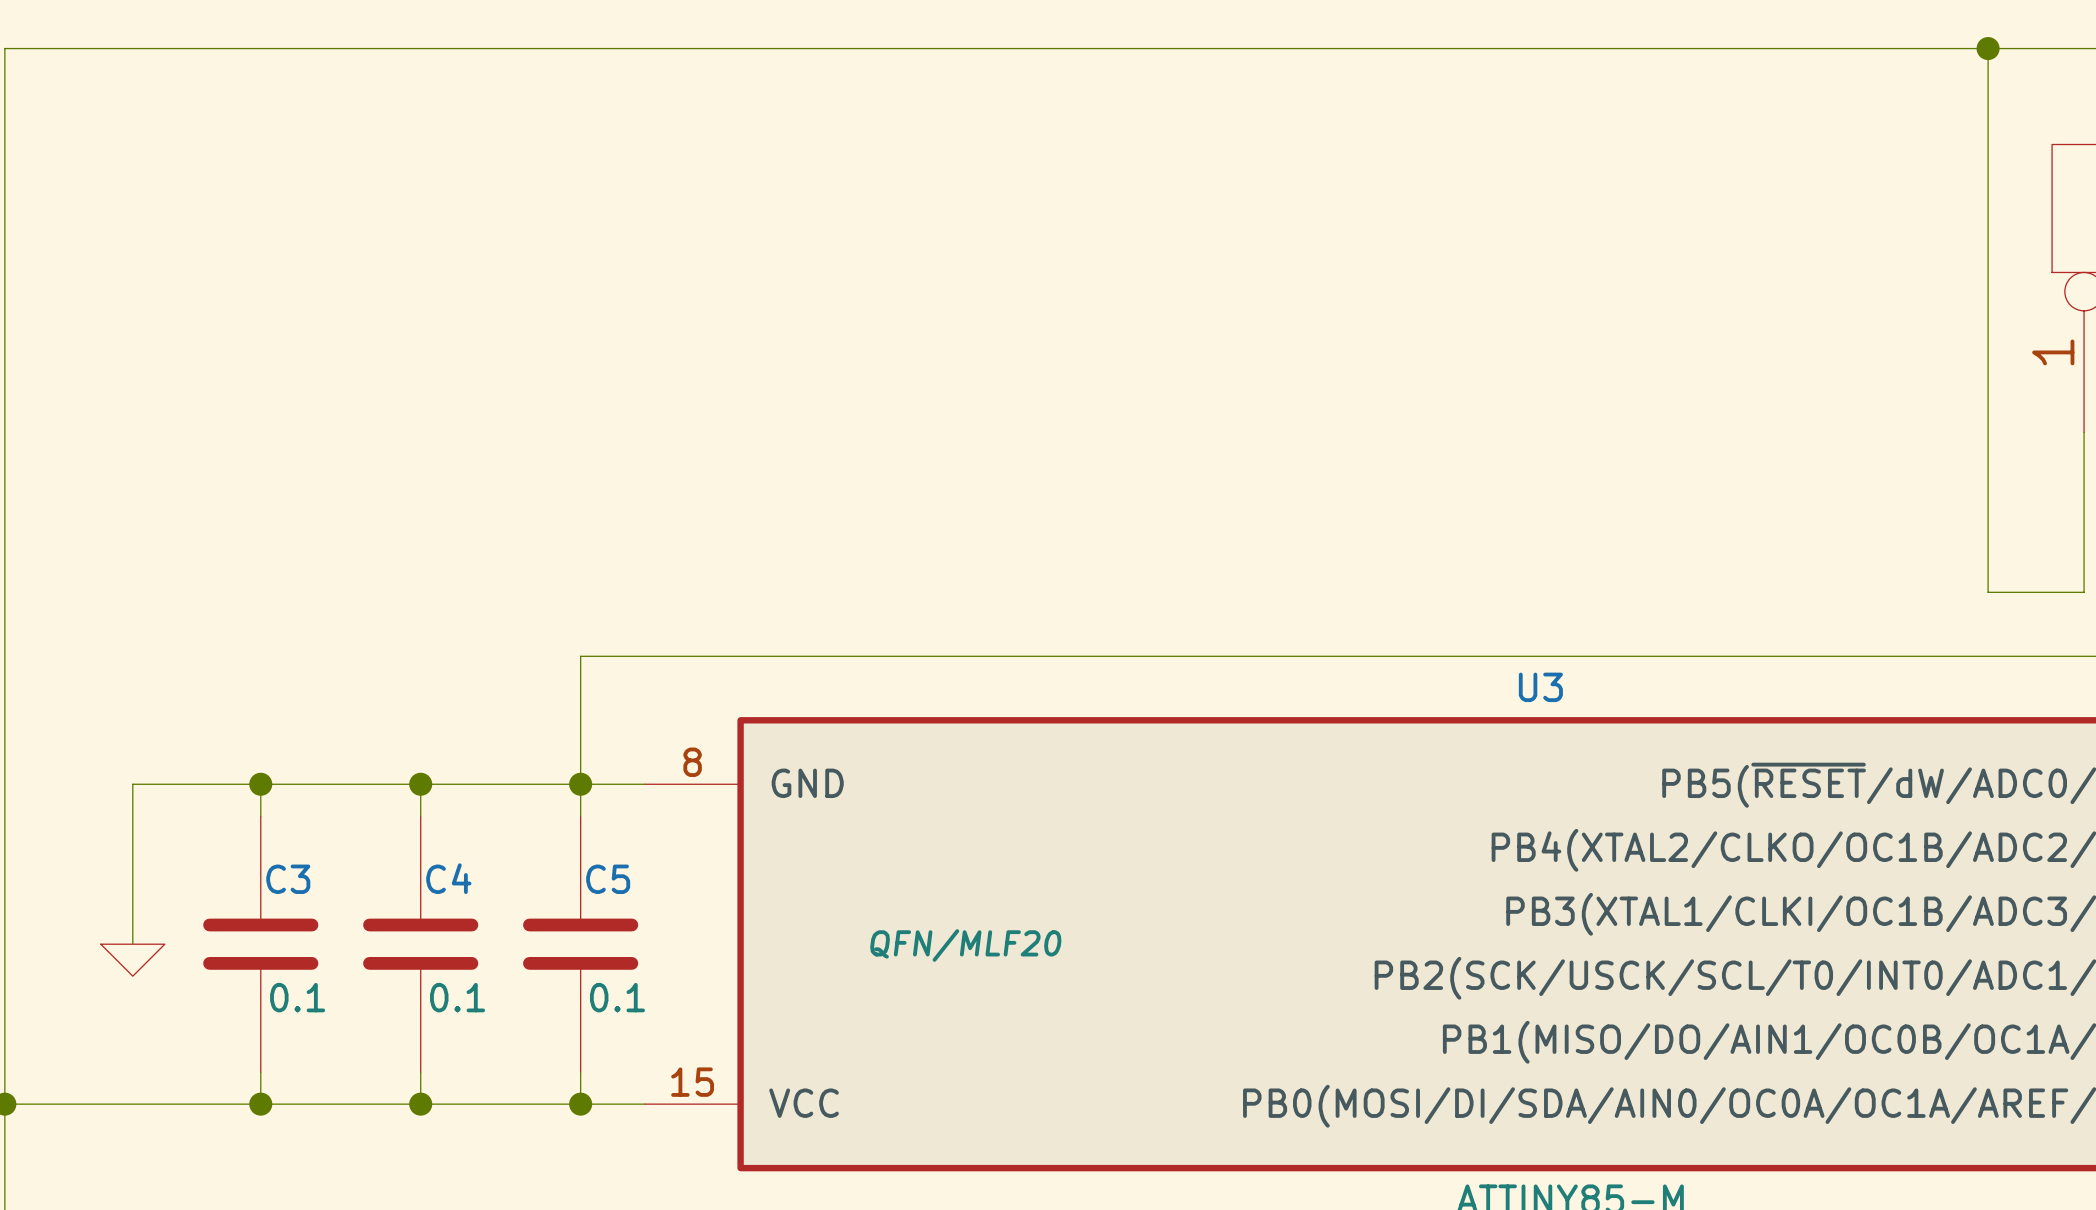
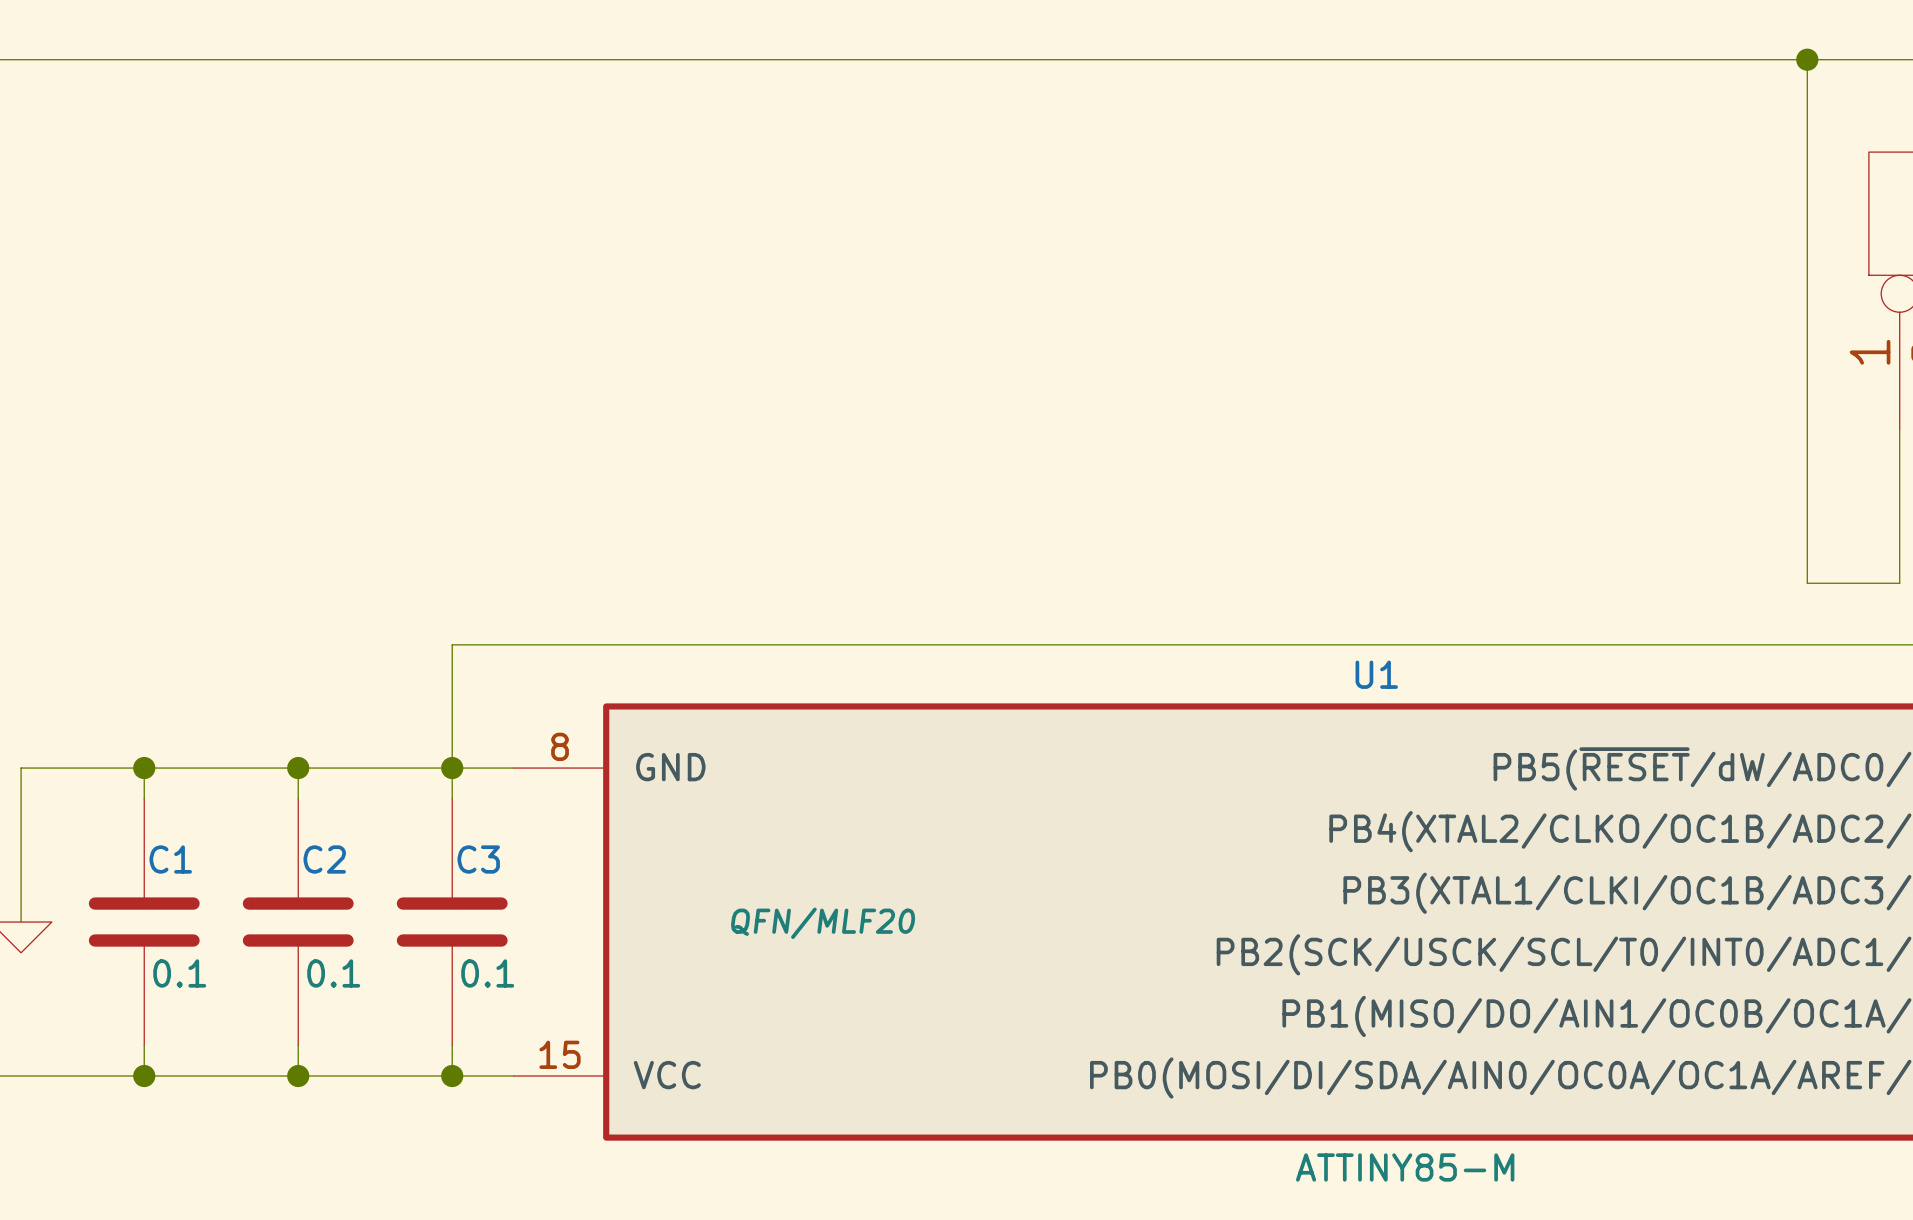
U3 name: U3 (1540, 687) -> U1 (1376, 674)
C4 name: C4 (448, 878) -> C2 (324, 859)
C3 name: C3 (288, 879) -> C1 (170, 859)
C5 name: C5 (608, 879) -> C3 (478, 859)

